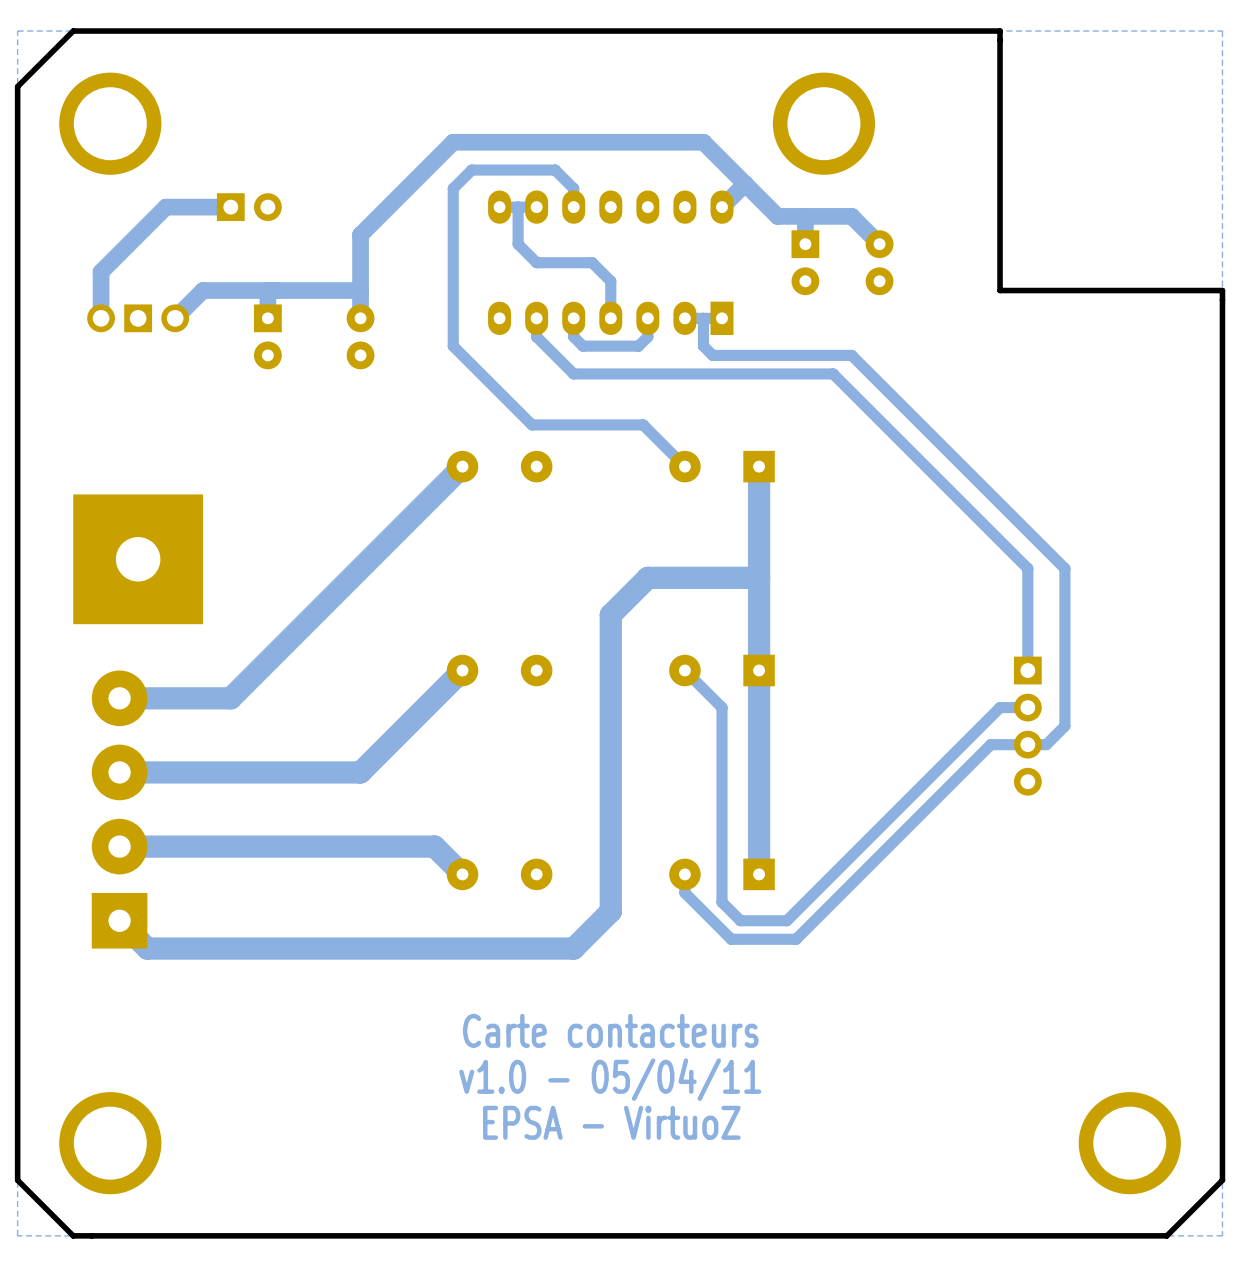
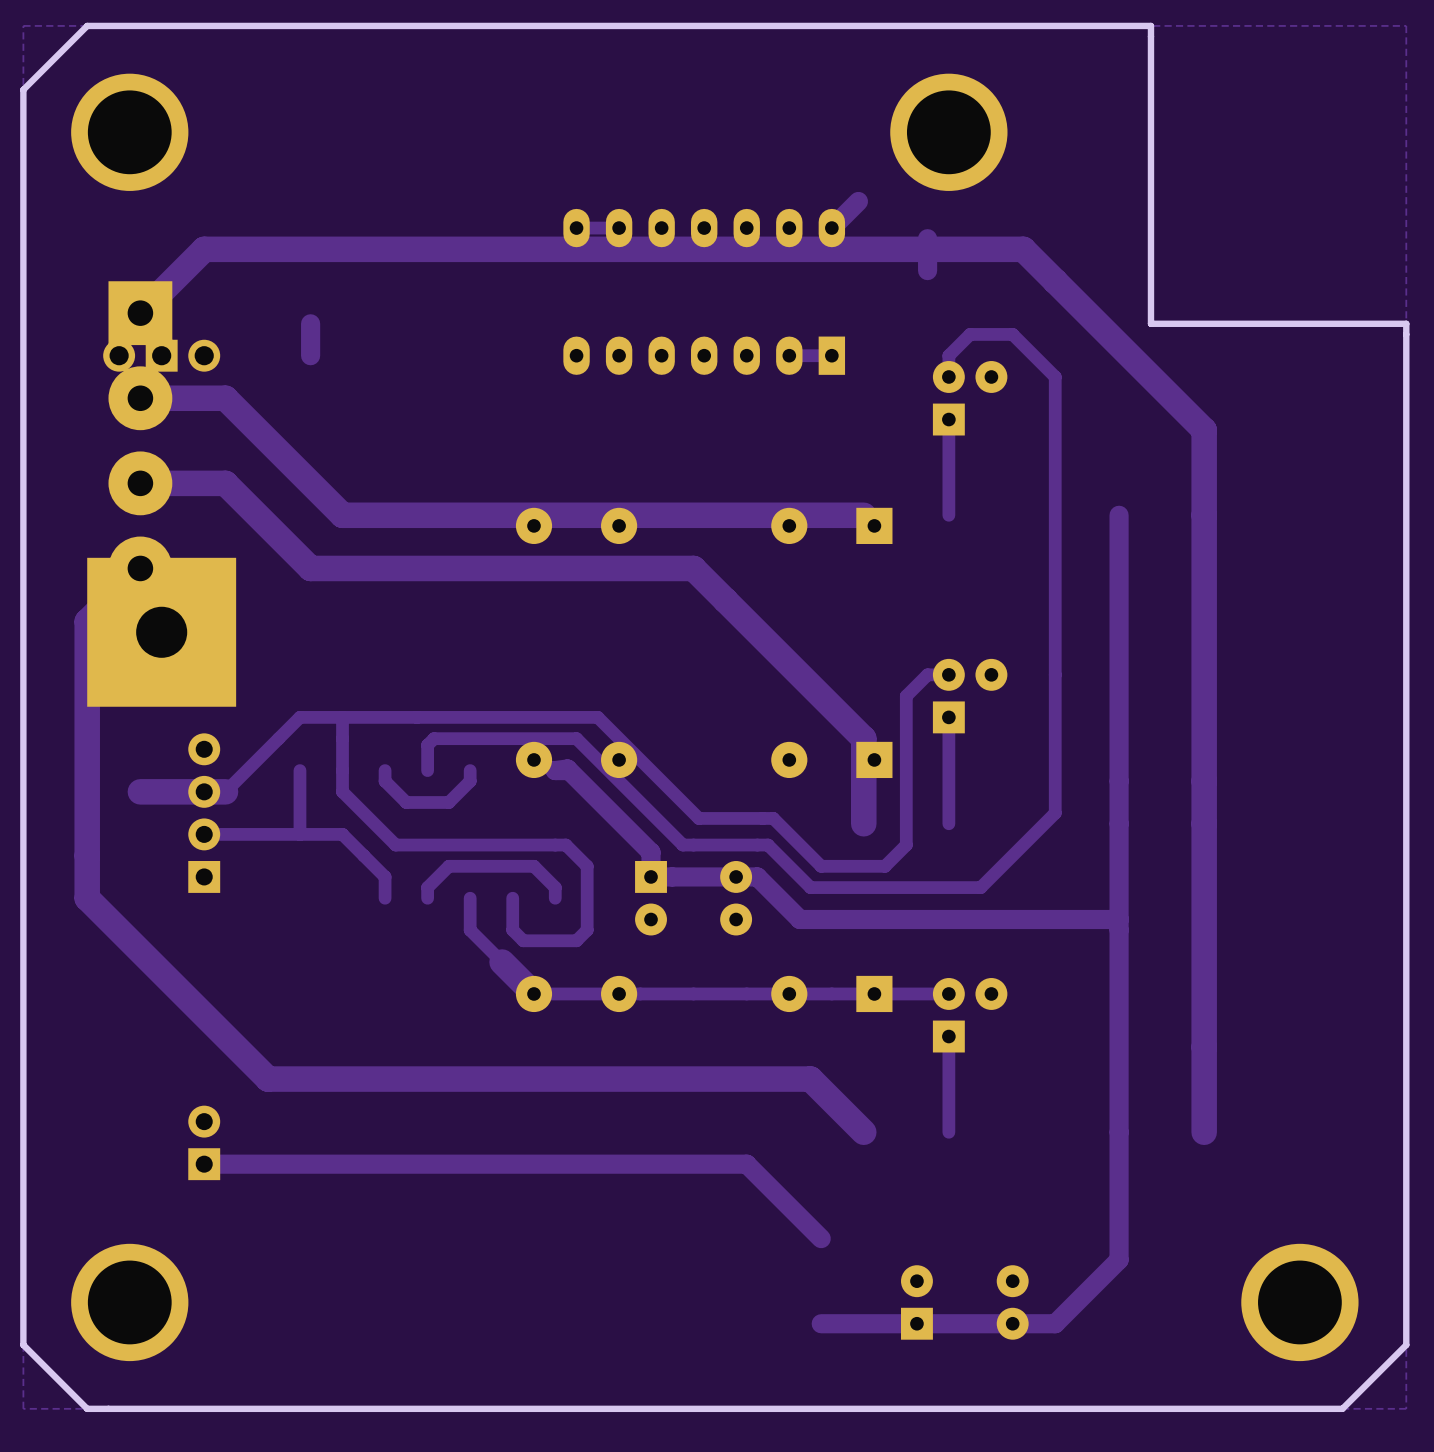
track: (230, 207) (165, 207) (101, 271) (101, 318) -> none
part: (249, 207) -> none
track: (518, 207) (518, 244) (536, 262) (592, 262) (610, 281) (610, 318) -> none
track: (573, 207) (573, 188) (555, 170) (471, 170) (453, 188) (453, 346) (532, 424) (643, 424) (684, 466) -> none
track: (879, 244) (851, 216) (777, 216) (703, 142) (453, 142) (360, 234) (360, 318) -> none
part: (805, 262) -> none
part: (879, 262) -> none
track: none -> (140, 313) (204, 249) (1023, 249) (1204, 430) (1204, 1132)
track: (360, 290) (203, 290) (175, 318) -> none
track: (536, 318) (536, 336) (573, 373) (833, 373) (1027, 568) (1027, 670) -> none
track: (647, 318) (647, 336) (638, 346) (582, 346) (573, 336) (573, 318) -> none
track: (703, 318) (703, 346) (712, 355) (851, 355) (1064, 568) (1064, 726) (1046, 744) (990, 744) (796, 939) (731, 939) (684, 892) (684, 874) -> none
part: (267, 336) -> none
part: (360, 336) -> none
track: none -> (948, 376) (948, 355) (970, 334) (1012, 334) (1055, 376) (1055, 813) (980, 887) (810, 887) (768, 845) (682, 845) (576, 738) (434, 738) (427, 745) (427, 770)
track: none -> (140, 398) (225, 398) (342, 515) (863, 515)
part: none -> (970, 398)
track: none -> (948, 419) (948, 515)
part: none -> (140, 440)
track: none -> (140, 483) (225, 483) (310, 568) (693, 568) (863, 738) (863, 823)
track: none -> (1119, 515) (1119, 1259) (1055, 1323) (821, 1323)
track: (462, 466) (230, 698) (193, 698) -> (948, 674) (927, 674) (906, 696) (906, 845) (885, 866) (821, 866) (773, 818) (698, 818) (597, 717) (299, 717) (225, 791)
track: (759, 466) (759, 874) -> none
track: (759, 577) (647, 577) (610, 614) (610, 911) (573, 948) -> (863, 1132) (810, 1079) (661, 1079)
part: none -> (970, 696)
track: none -> (342, 717) (342, 791) (395, 845) (565, 845) (587, 866) (587, 930) (576, 940) (523, 940) (512, 930) (512, 898)
track: none -> (948, 717) (948, 823)
track: (462, 670) (360, 772) (119, 772) -> none
track: (684, 670) (722, 707) (722, 902) (740, 920) (786, 920) (1000, 707) (1027, 707) -> none
track: none -> (299, 770) (299, 834)
track: none -> (470, 770) (470, 781) (448, 802) (406, 802) (385, 781) (385, 770)
track: none -> (565, 770) (555, 770) (567, 768) (651, 852) (651, 876) (757, 876) (799, 919) (1119, 919)
part: none -> (204, 813)
part: (1027, 726) -> none
track: none -> (204, 834) (342, 834) (385, 876) (385, 898)
track: none -> (555, 898) (555, 887) (533, 866) (448, 866) (427, 887) (427, 898)
part: none -> (651, 898)
part: none -> (736, 898)
part: (119, 809) -> none
track: (434, 846) (119, 846) -> (502, 962) (470, 930) (470, 898)
track: none -> (948, 993) (533, 993)
part: none -> (970, 1015)
track: none -> (948, 1036) (948, 1132)
track: (119, 920) (147, 948) (230, 948) -> (140, 568) (87, 621) (87, 898) (268, 1079)
part: none -> (204, 1142)
track: none -> (204, 1164) (746, 1164) (821, 1238)
text: Carte contacteurs (610, 1030) -> none
text: v1.0 - 05/04/11 (610, 1079) -> none
text: EPSA - VirtuoZ (611, 1122) -> none
part: none -> (916, 1302)
part: none -> (1012, 1302)

